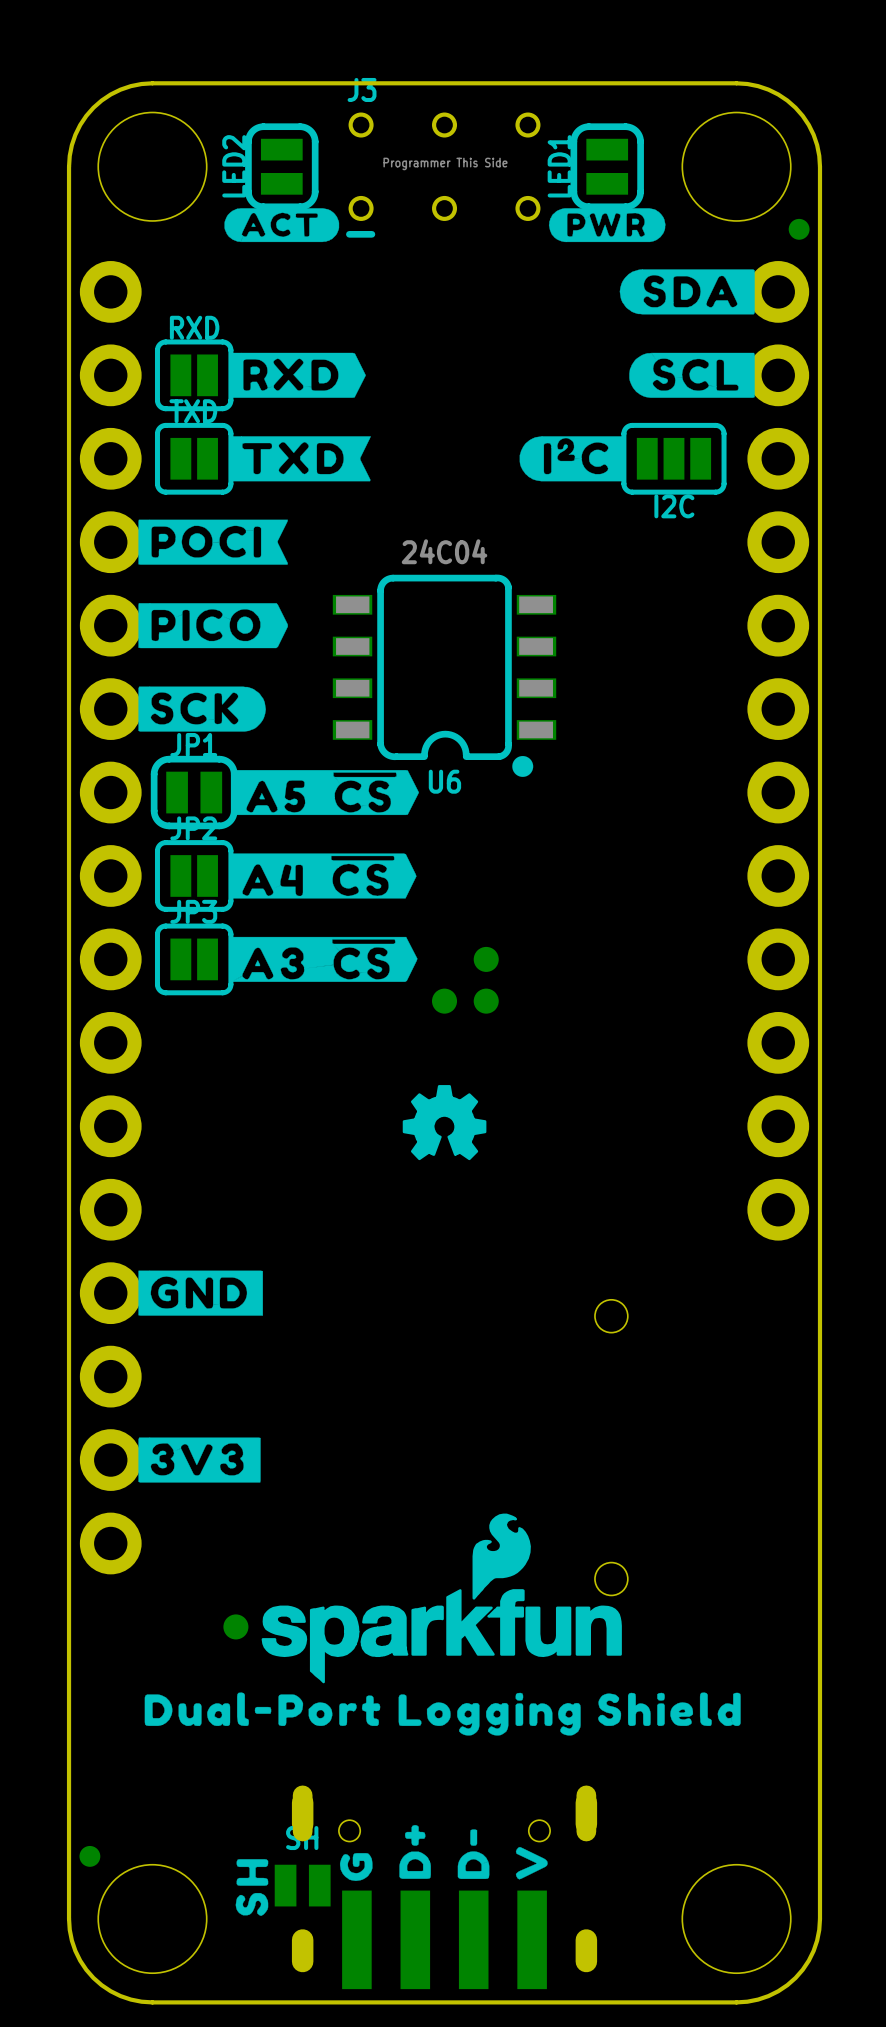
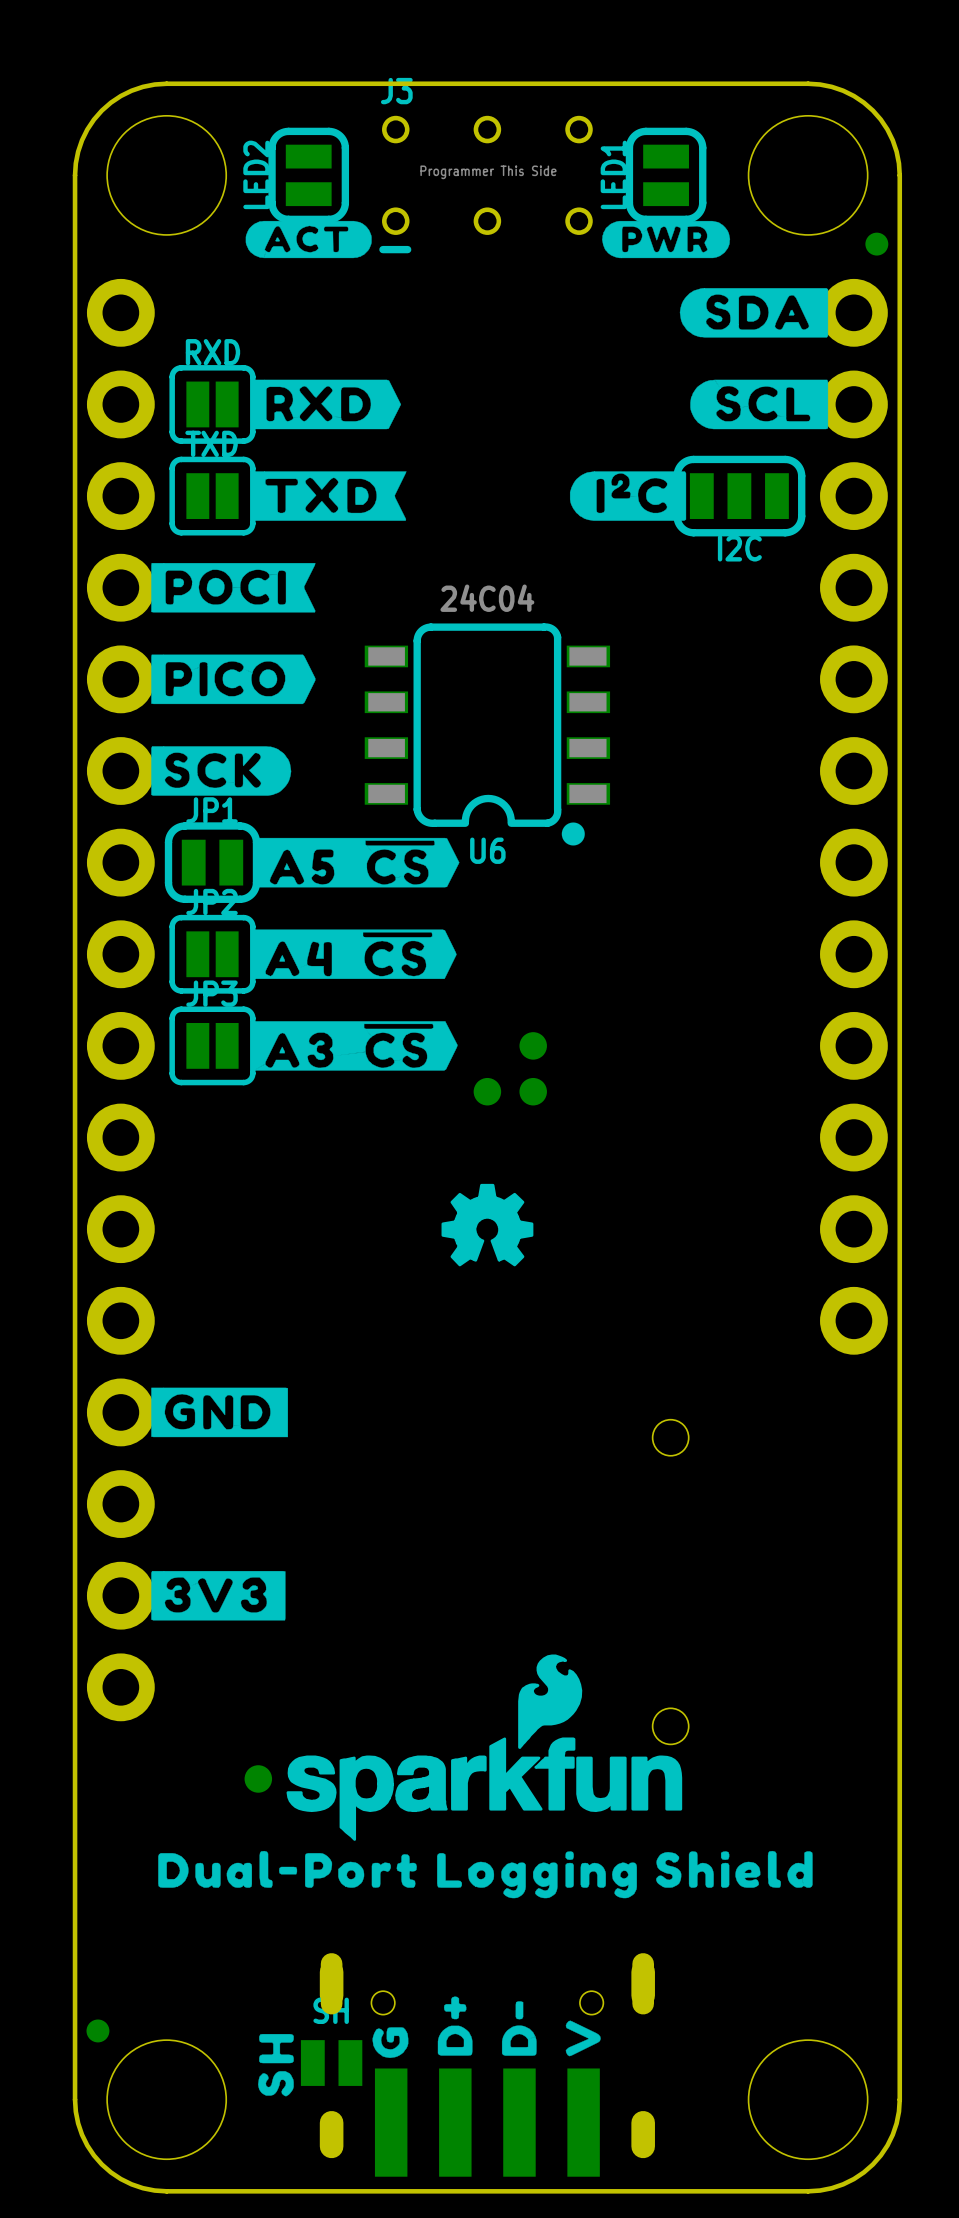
I2C footprint: [621, 422, 727, 495] -> [673, 455, 806, 537]

